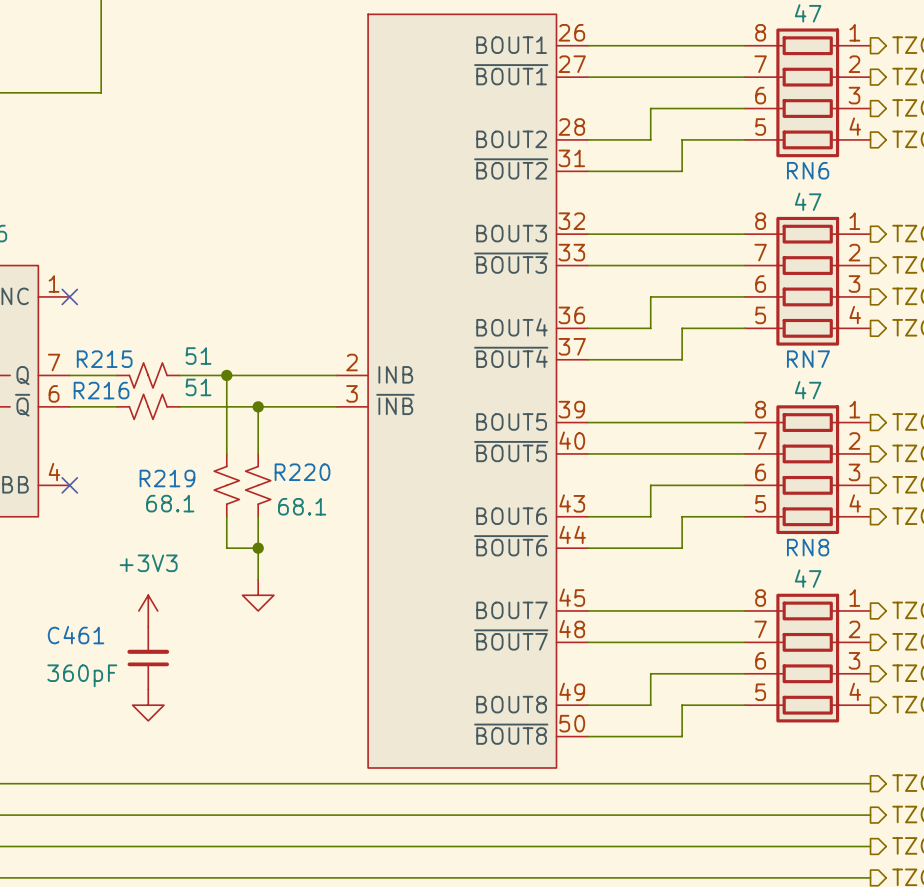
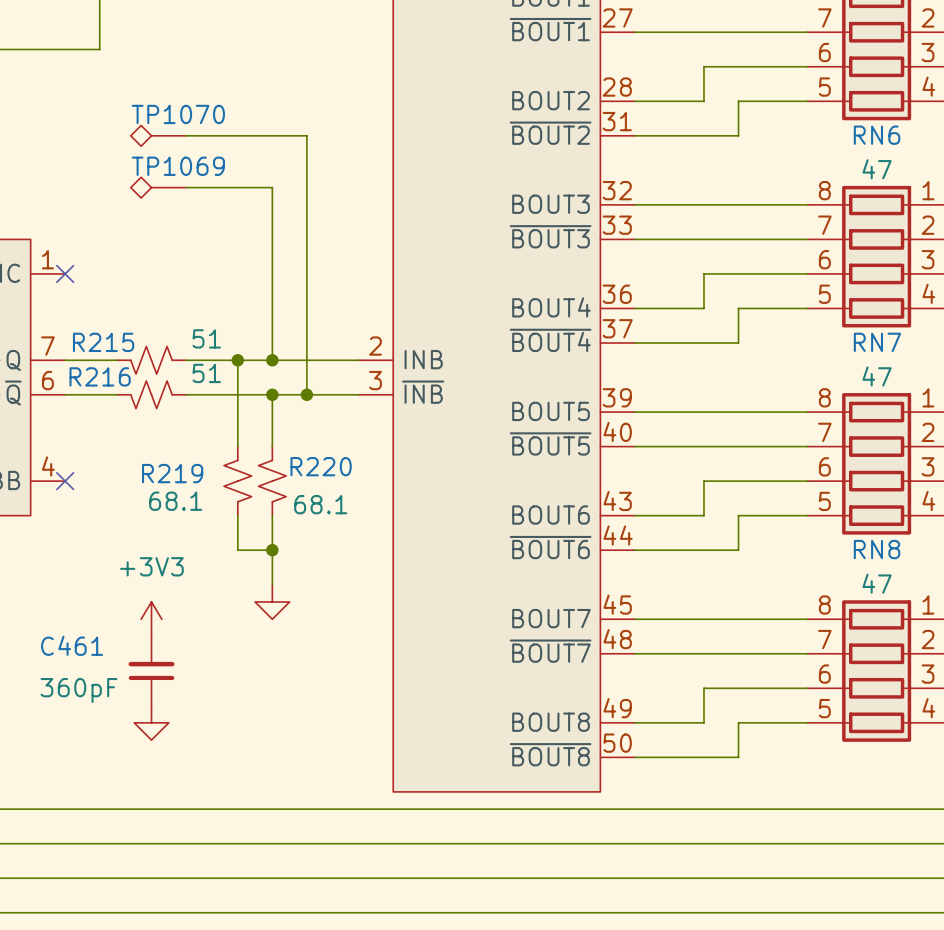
TP1070: none -> (158, 135)
wire: none -> (186, 135) (306, 135) (306, 394)
TP1069: none -> (158, 187)
wire: none -> (186, 187) (272, 187) (272, 360)
junction: none -> (272, 360)
junction: none -> (306, 394)

